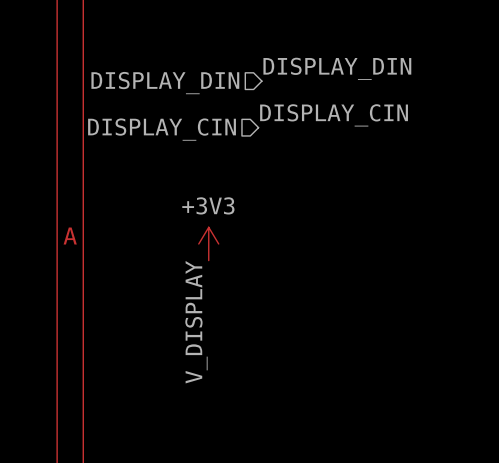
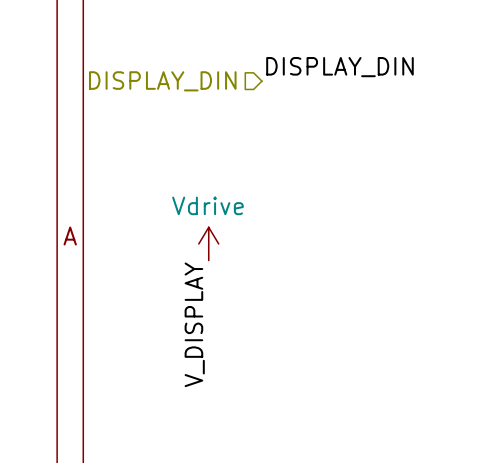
label: DISPLAY_CIN (334, 115) -> none
hierarchical label: DISPLAY_CIN (162, 129) -> none
power symbol: +3V3 (208, 243) -> Vdrive (208, 243)

